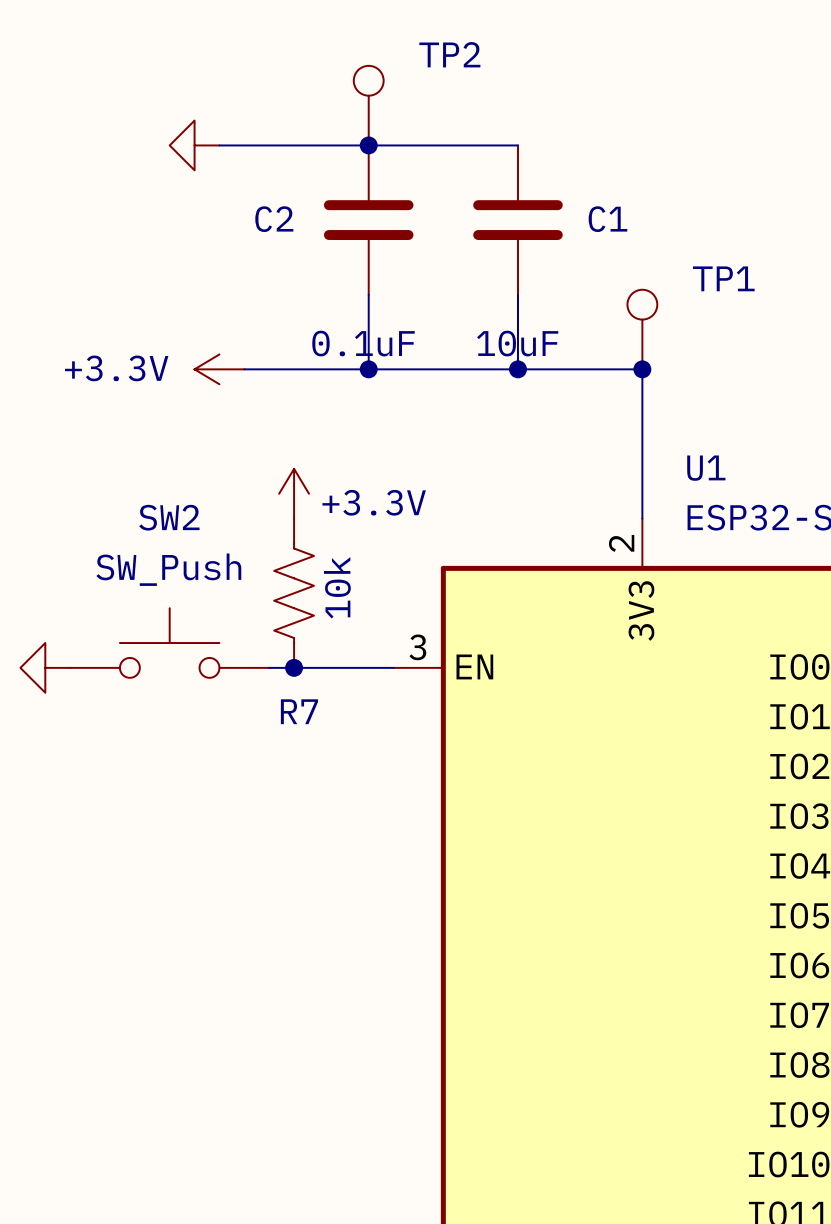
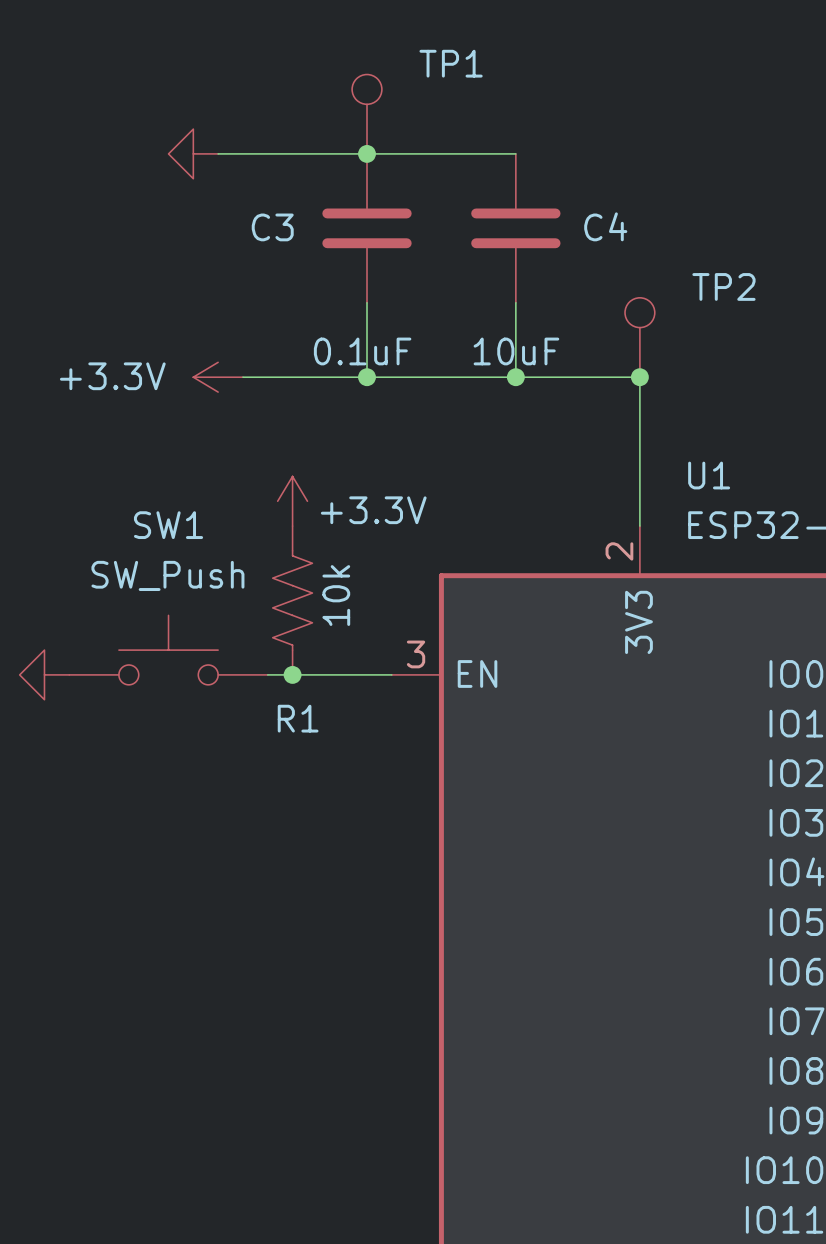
TP2 name: TP2 (449, 54) -> TP1 (451, 63)
C2 name: C2 (274, 219) -> C3 (272, 227)
C1 name: C1 (607, 219) -> C4 (605, 226)
TP1 name: TP1 (723, 278) -> TP2 (723, 286)
SW2 name: SW2 (169, 517) -> SW1 (168, 525)
R7 name: R7 (299, 711) -> R1 (298, 718)

